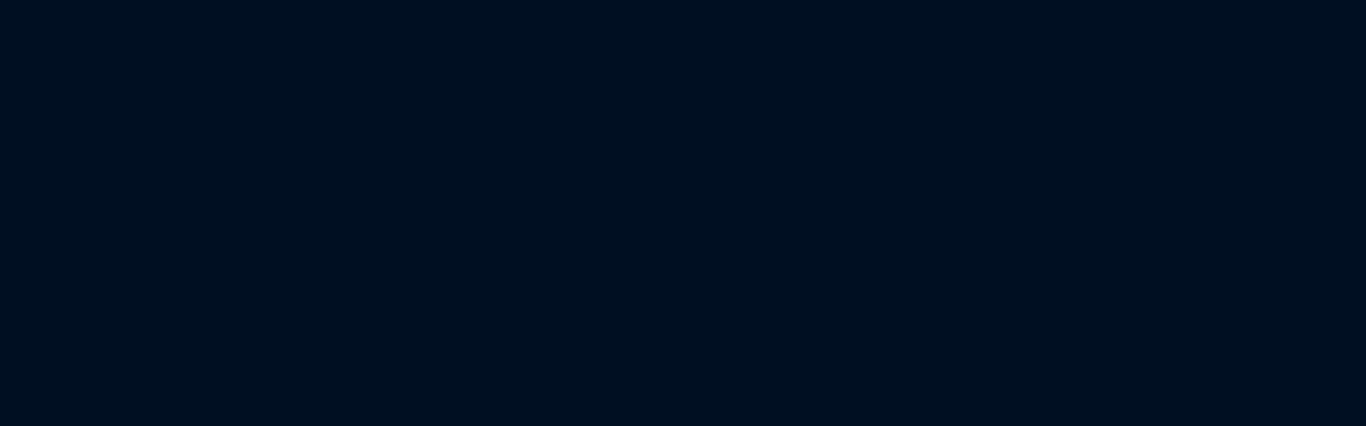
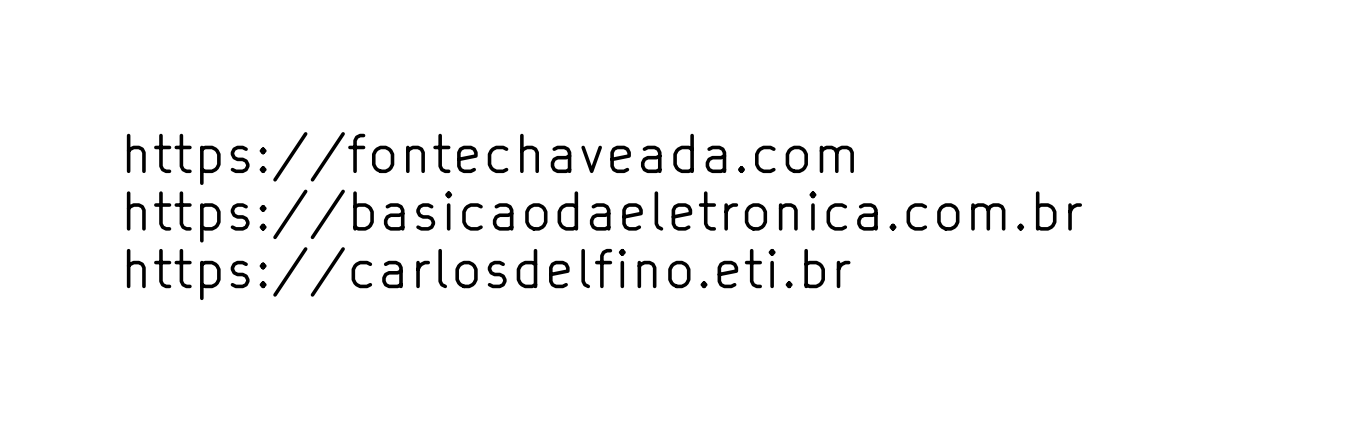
text: none -> https://fontechaveada.com (490, 158)
text: none -> https://basicaodaeletronica.com.br (604, 216)
text: none -> https://carlosdelfino.eti.br (488, 273)

